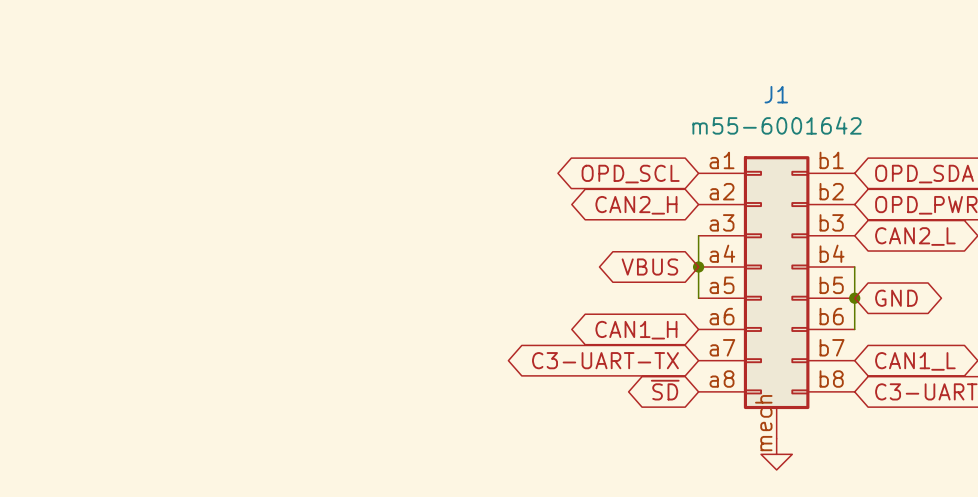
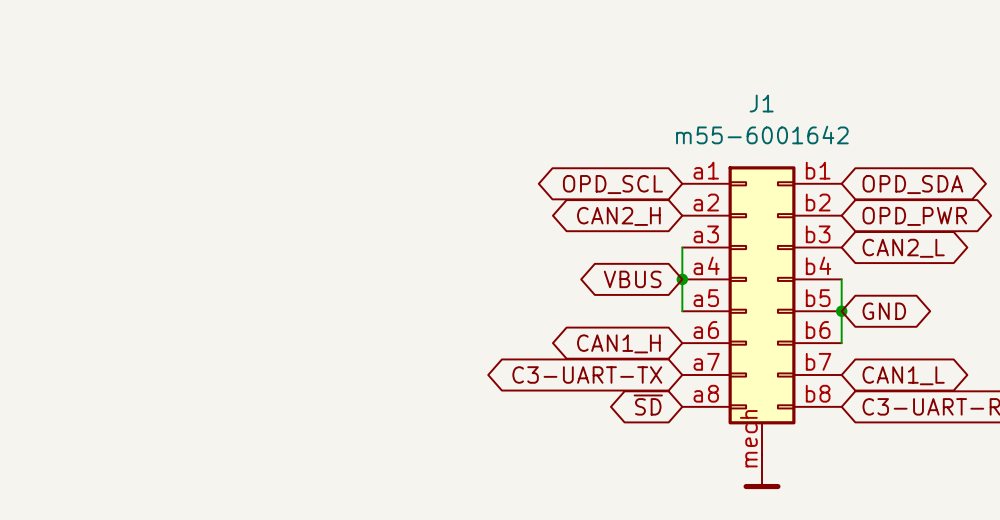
power symbol shape: [761, 438, 793, 470] -> [743, 454, 781, 490]

